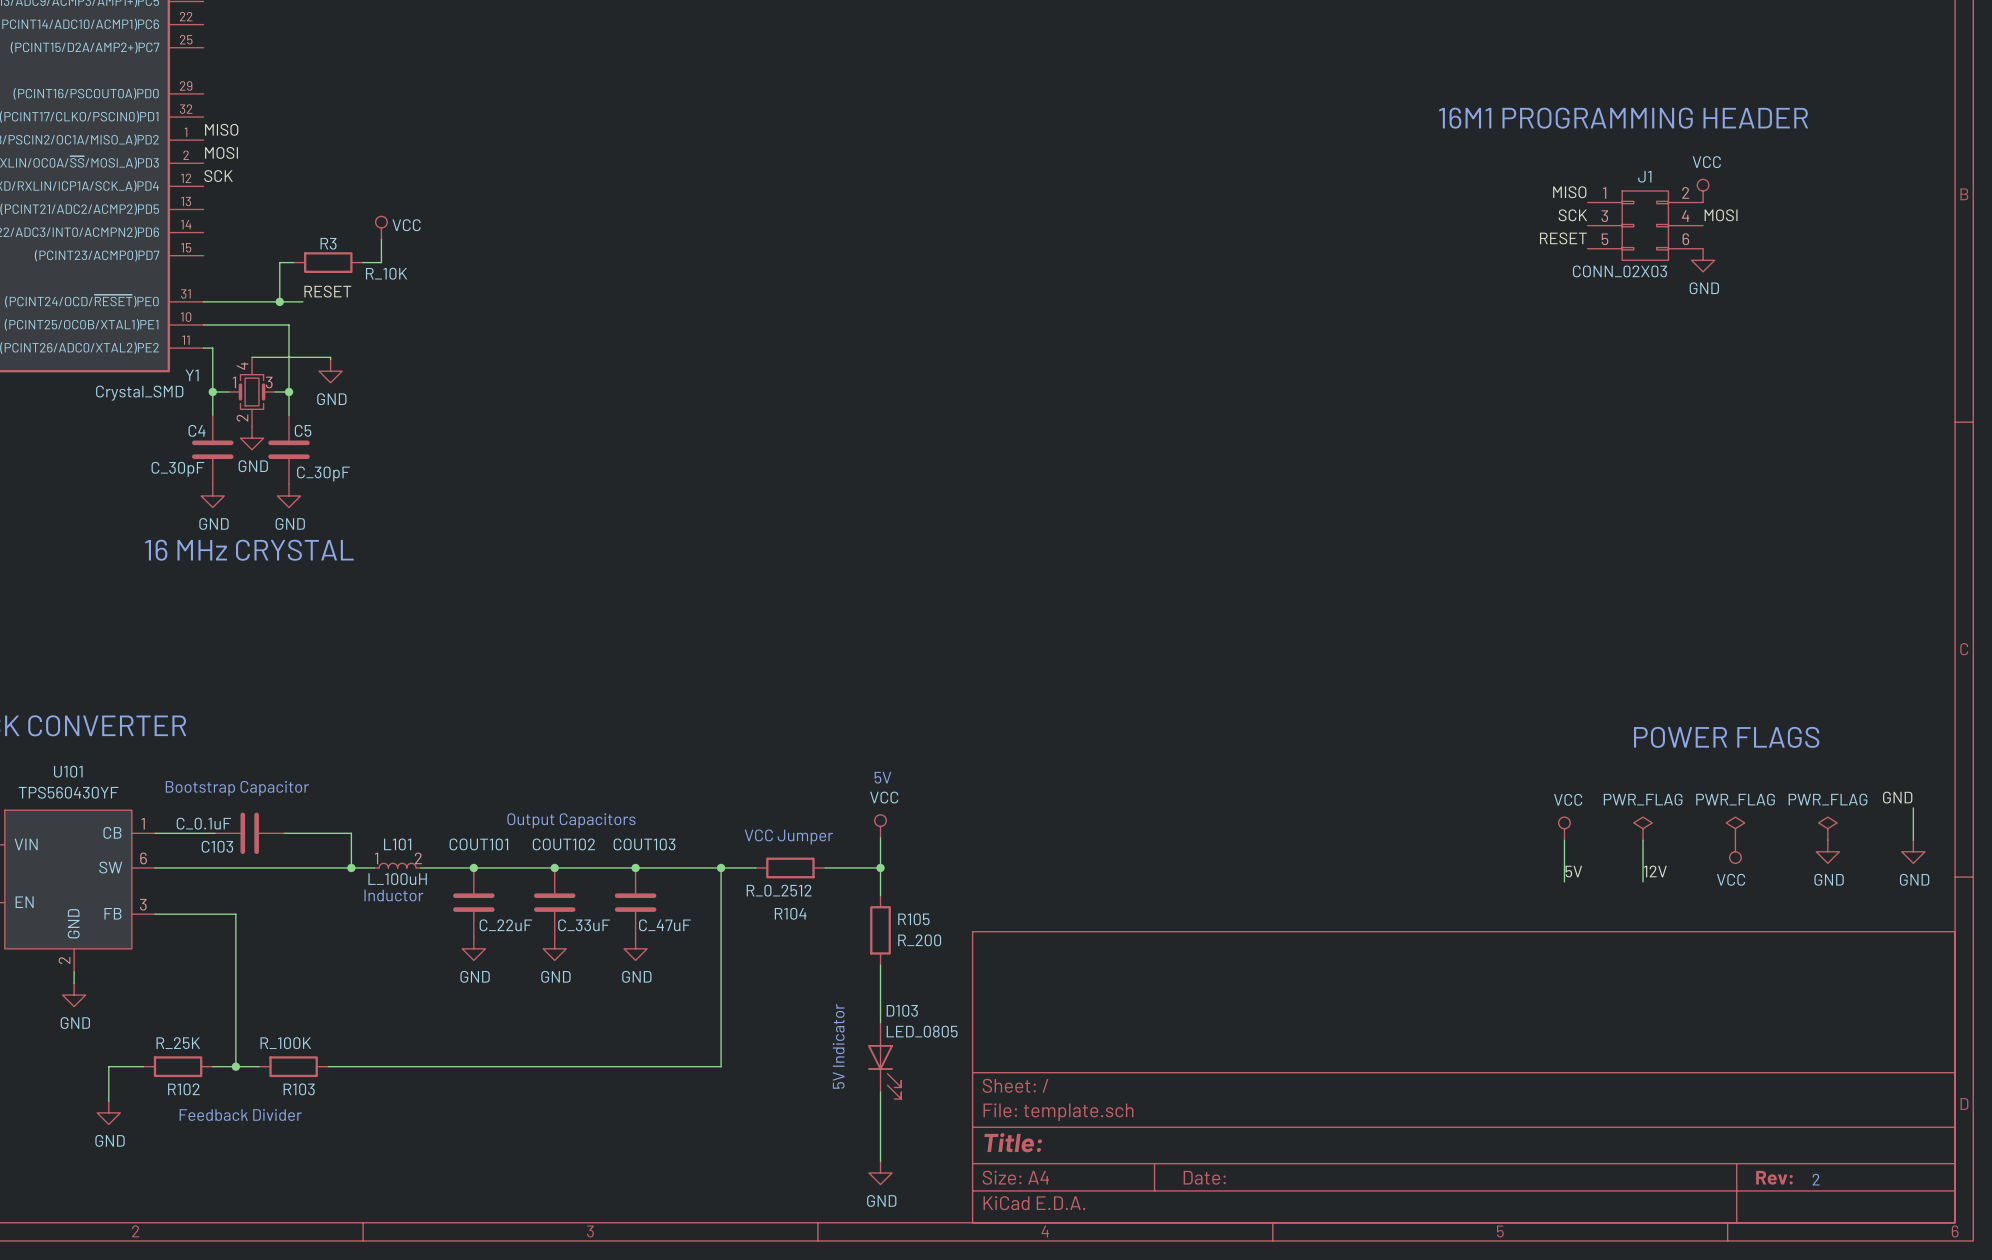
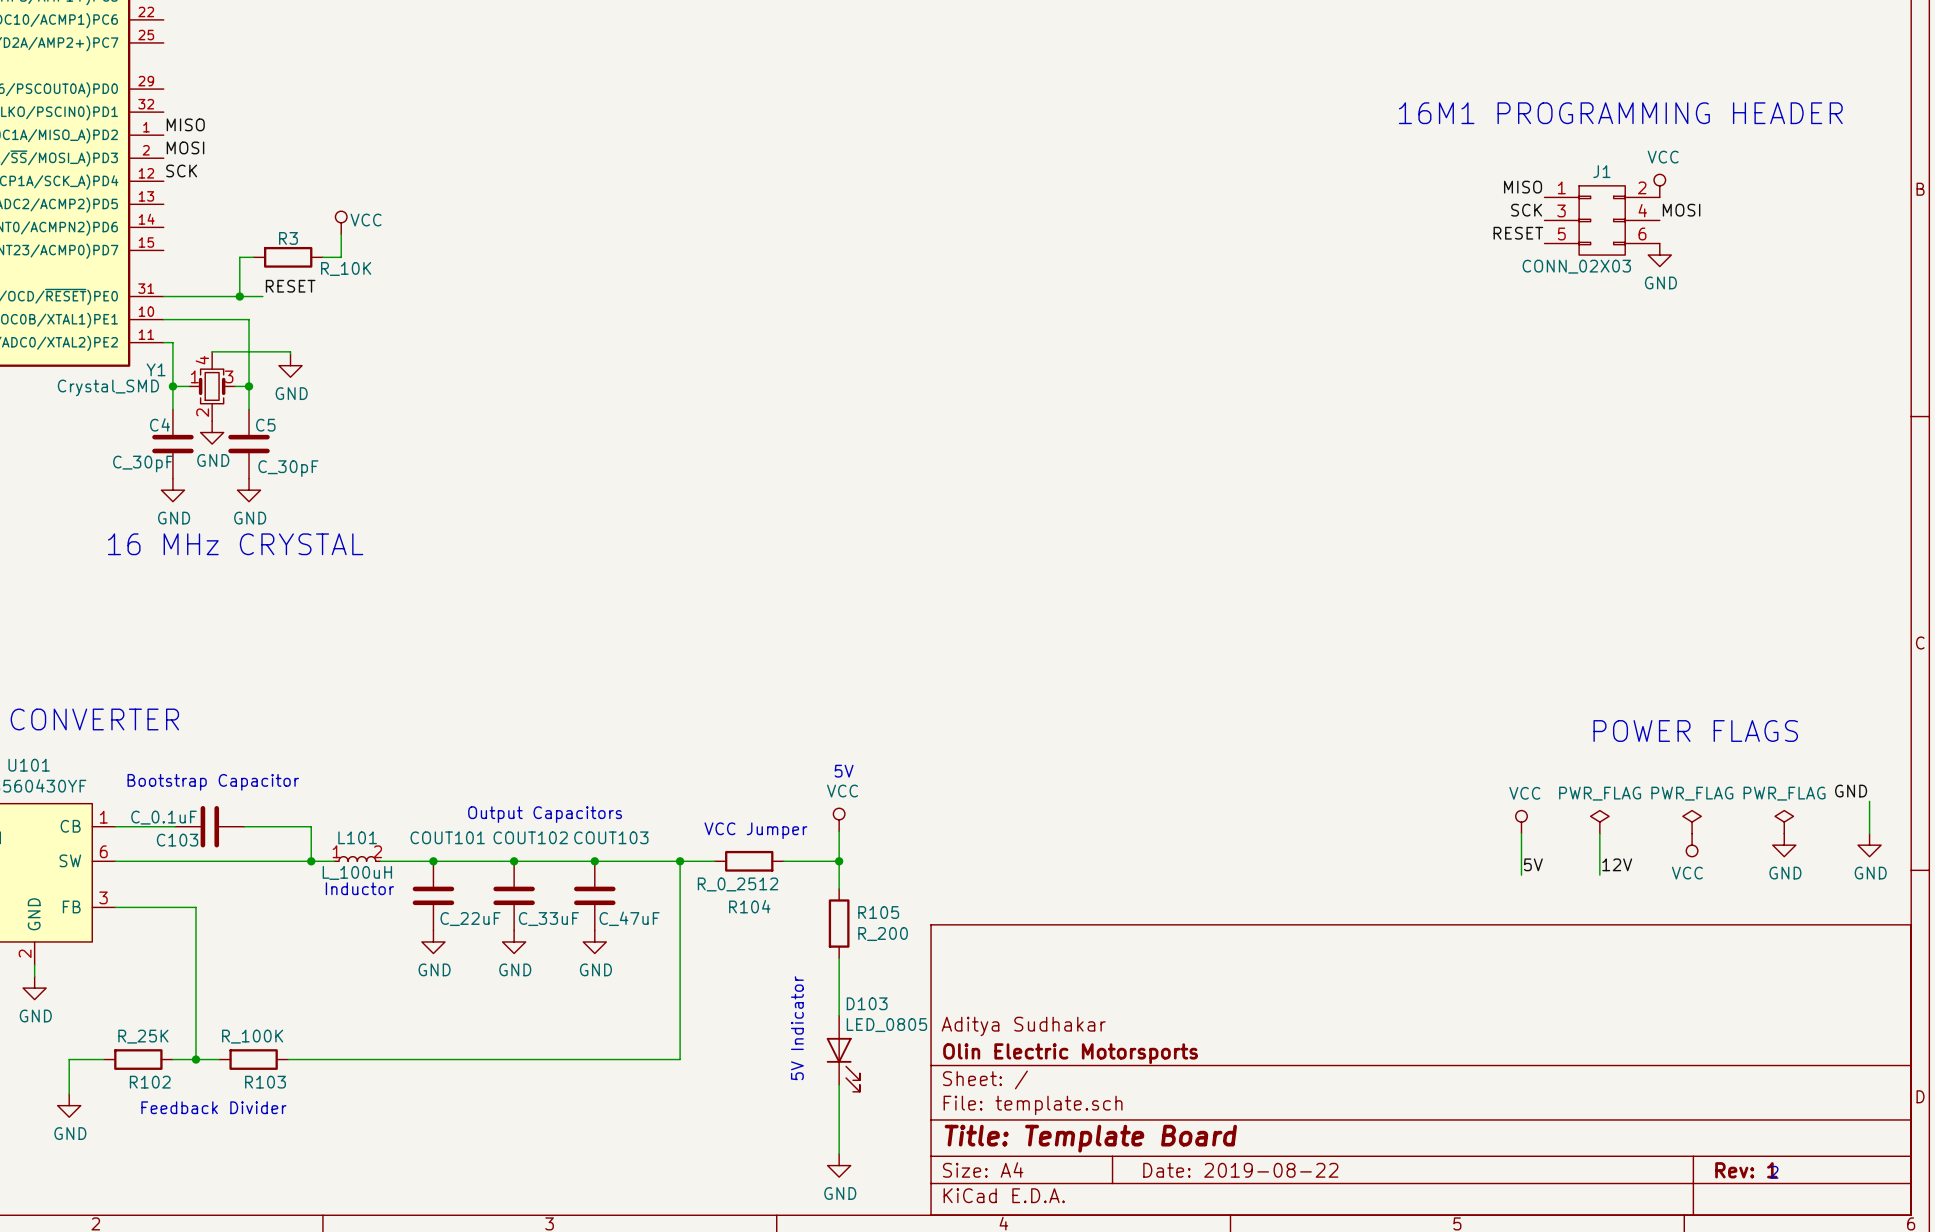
title block: none -> Aditya Sudhakar (1023, 1026)
title block: none -> Olin Electric Motorsports (1070, 1053)
title block: Title: (1013, 1142) -> Title: Template Board (1090, 1138)
title block: Date: (1204, 1177) -> Date: 2019-08-22 (1240, 1170)
title block: Rev: (1774, 1177) -> Rev: 1 (1746, 1170)

